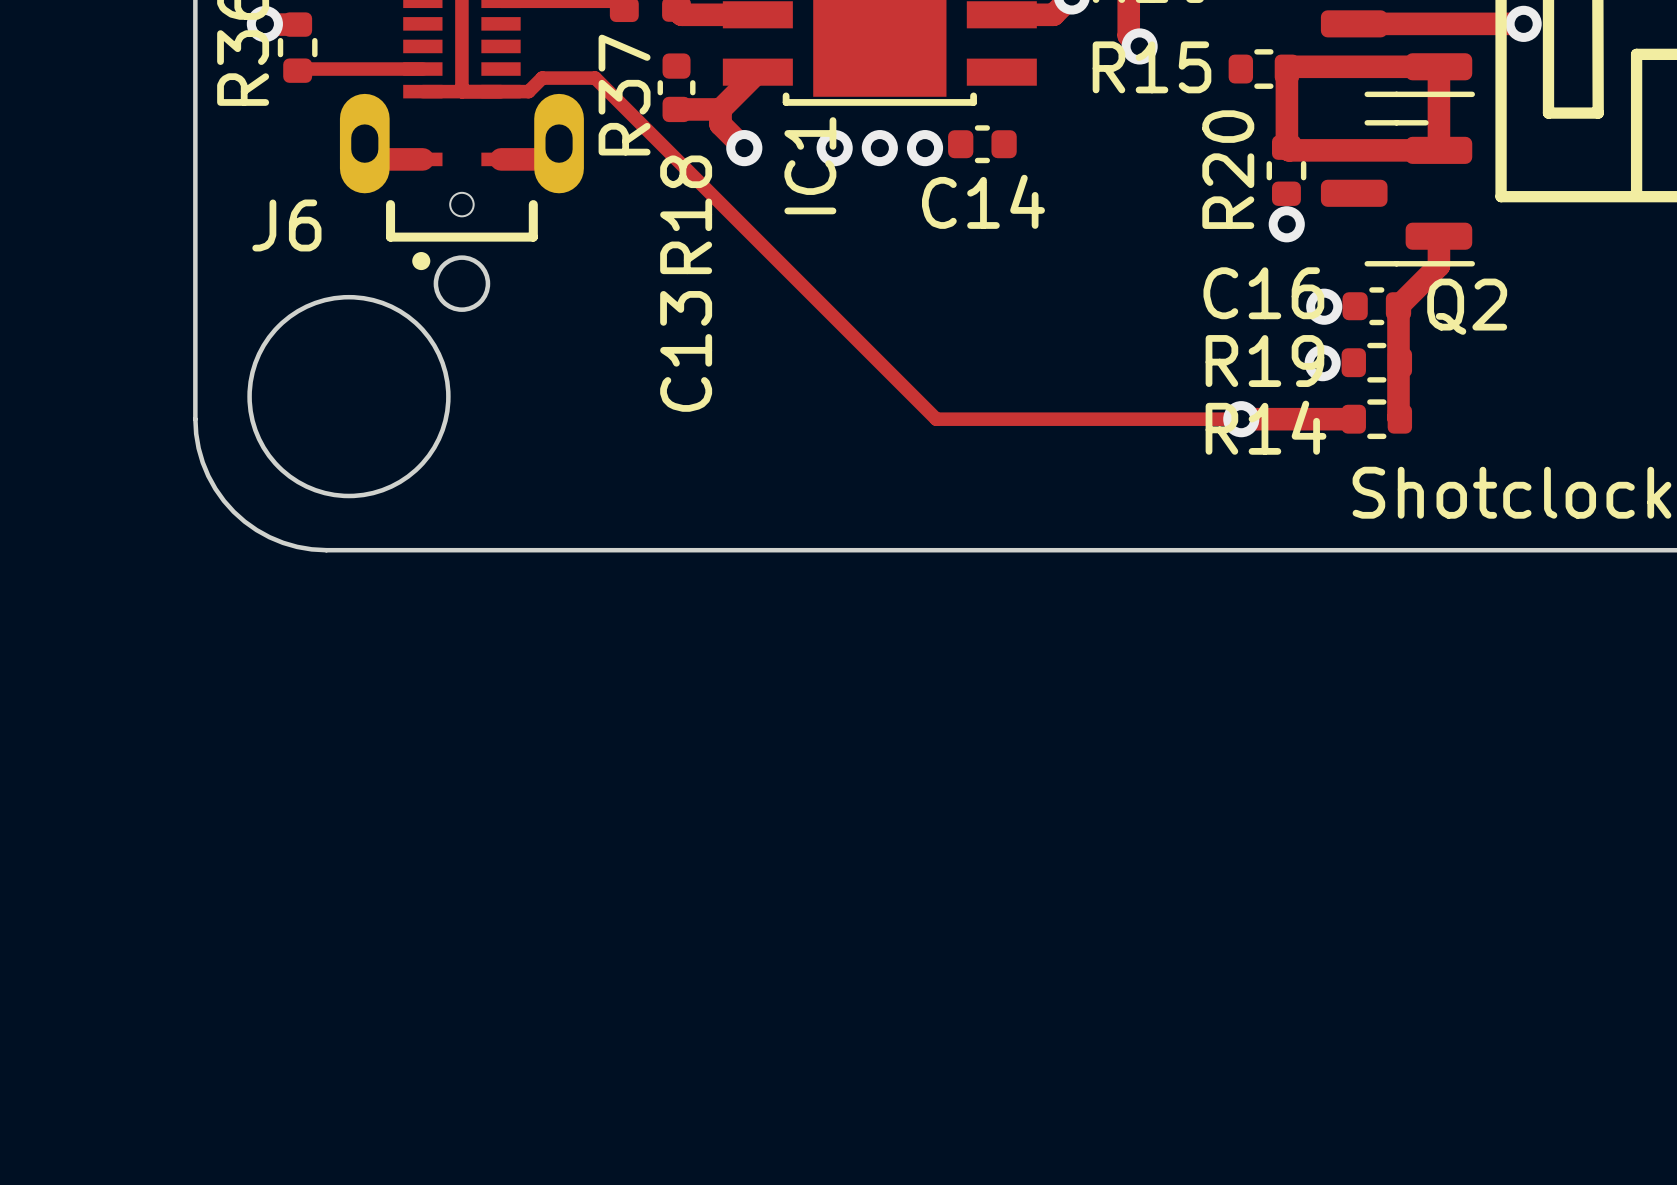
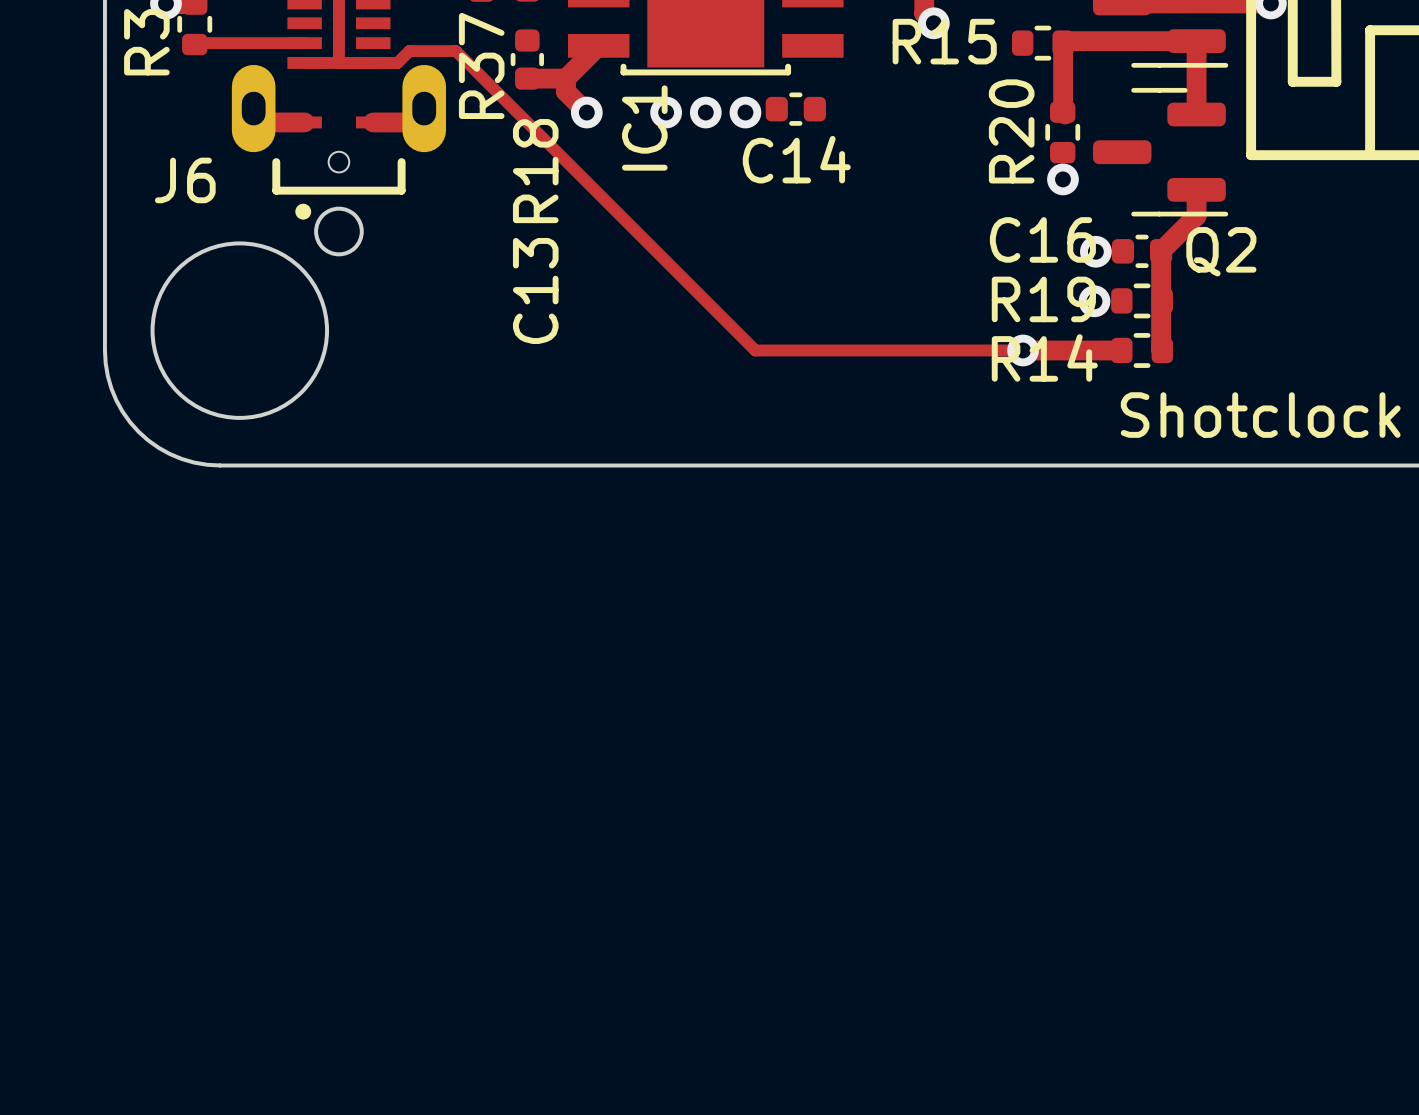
track: (1289, 150) (1438, 150) -> none

